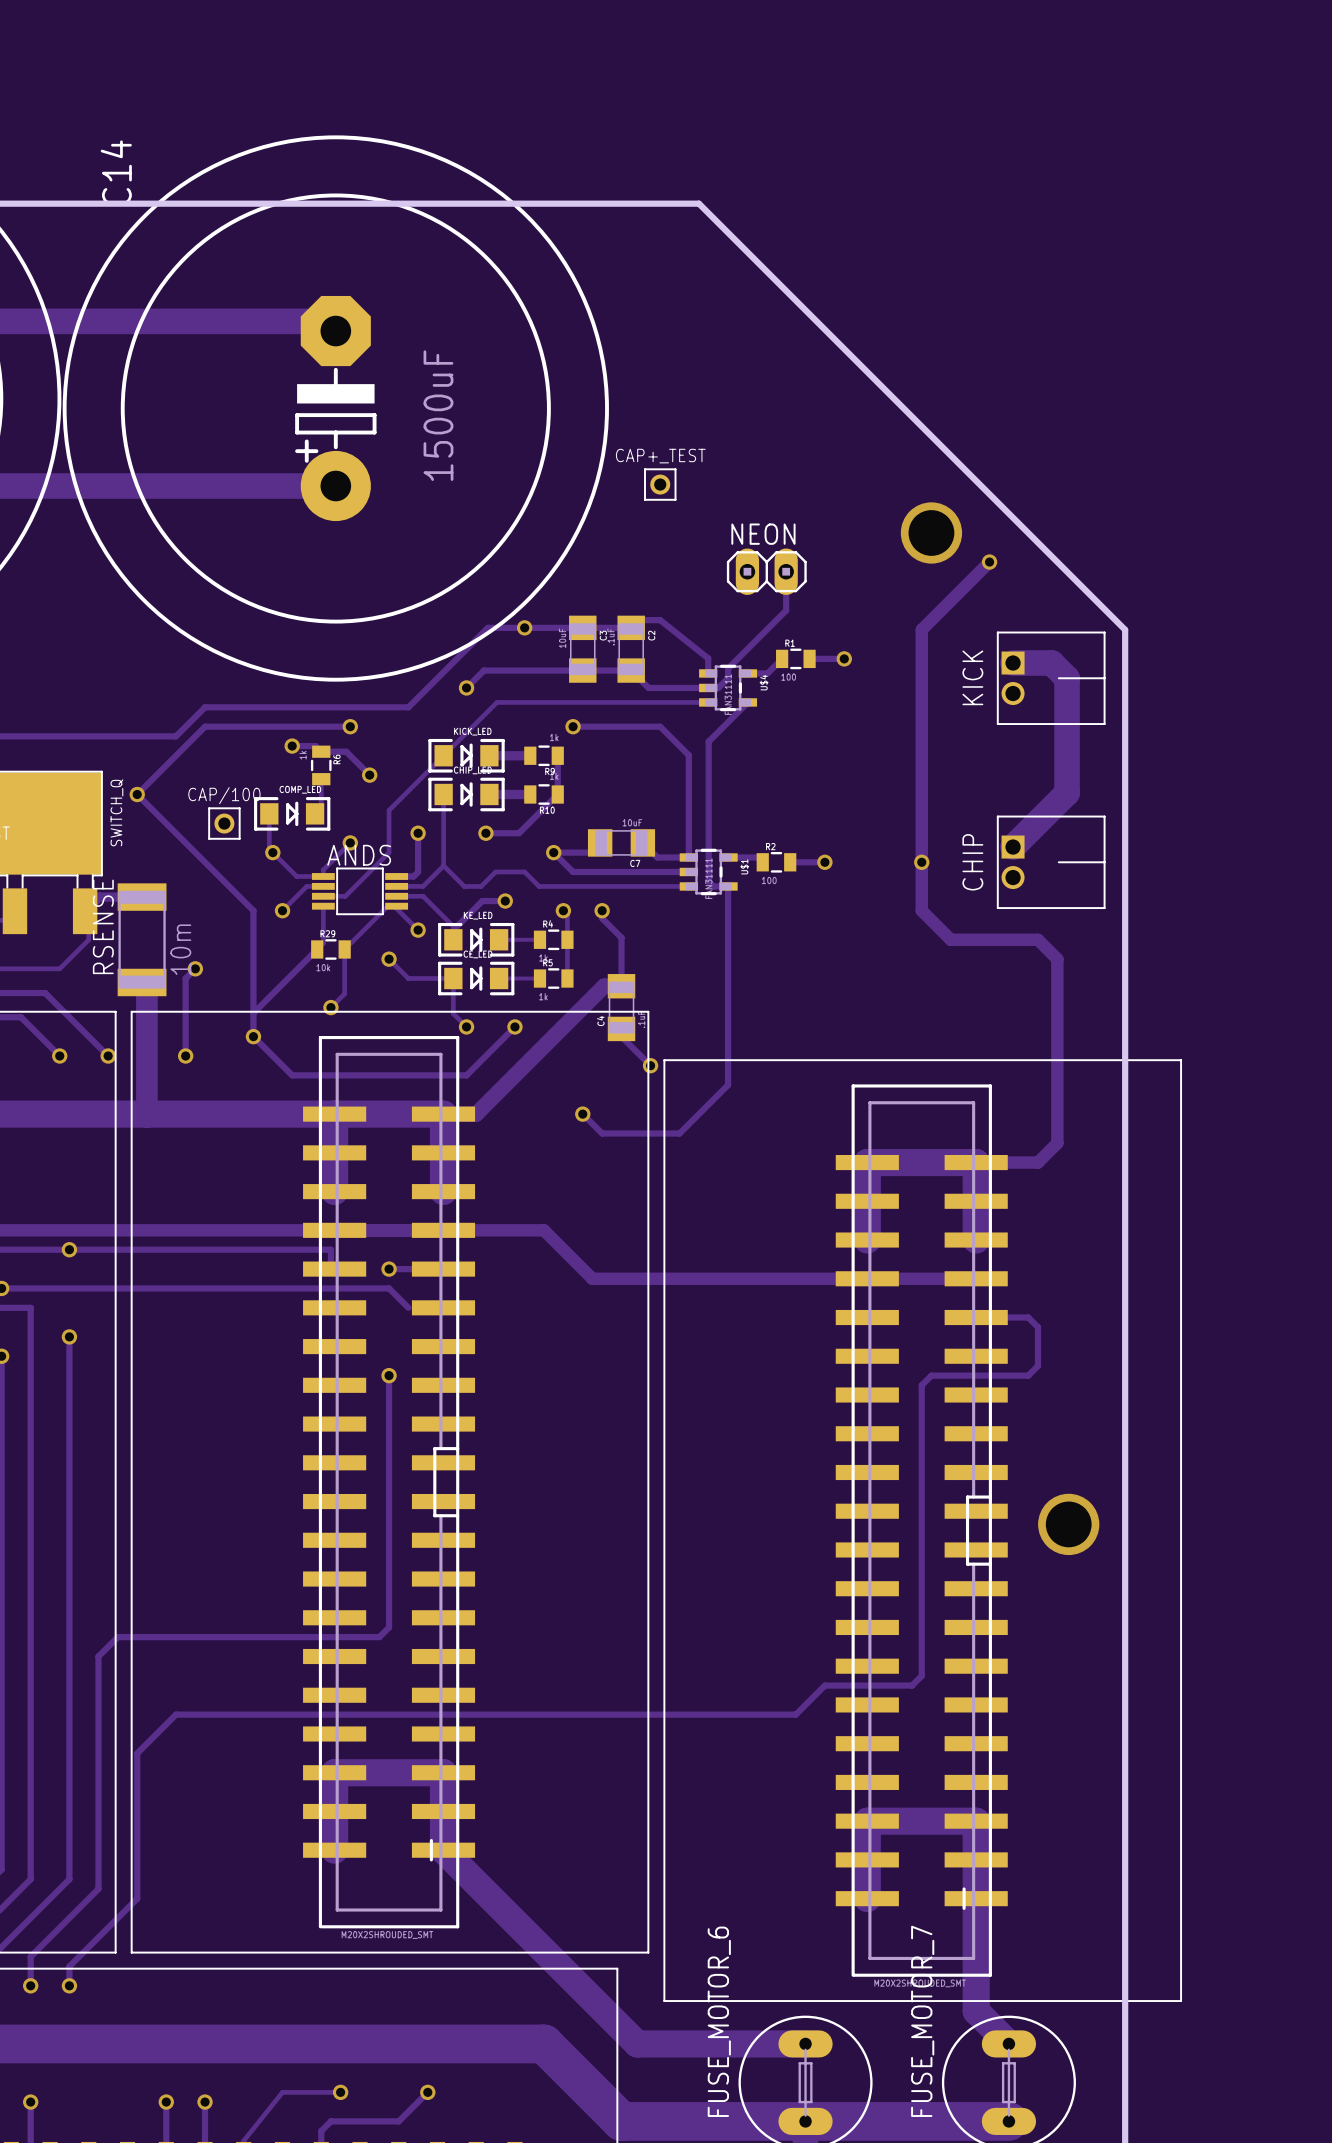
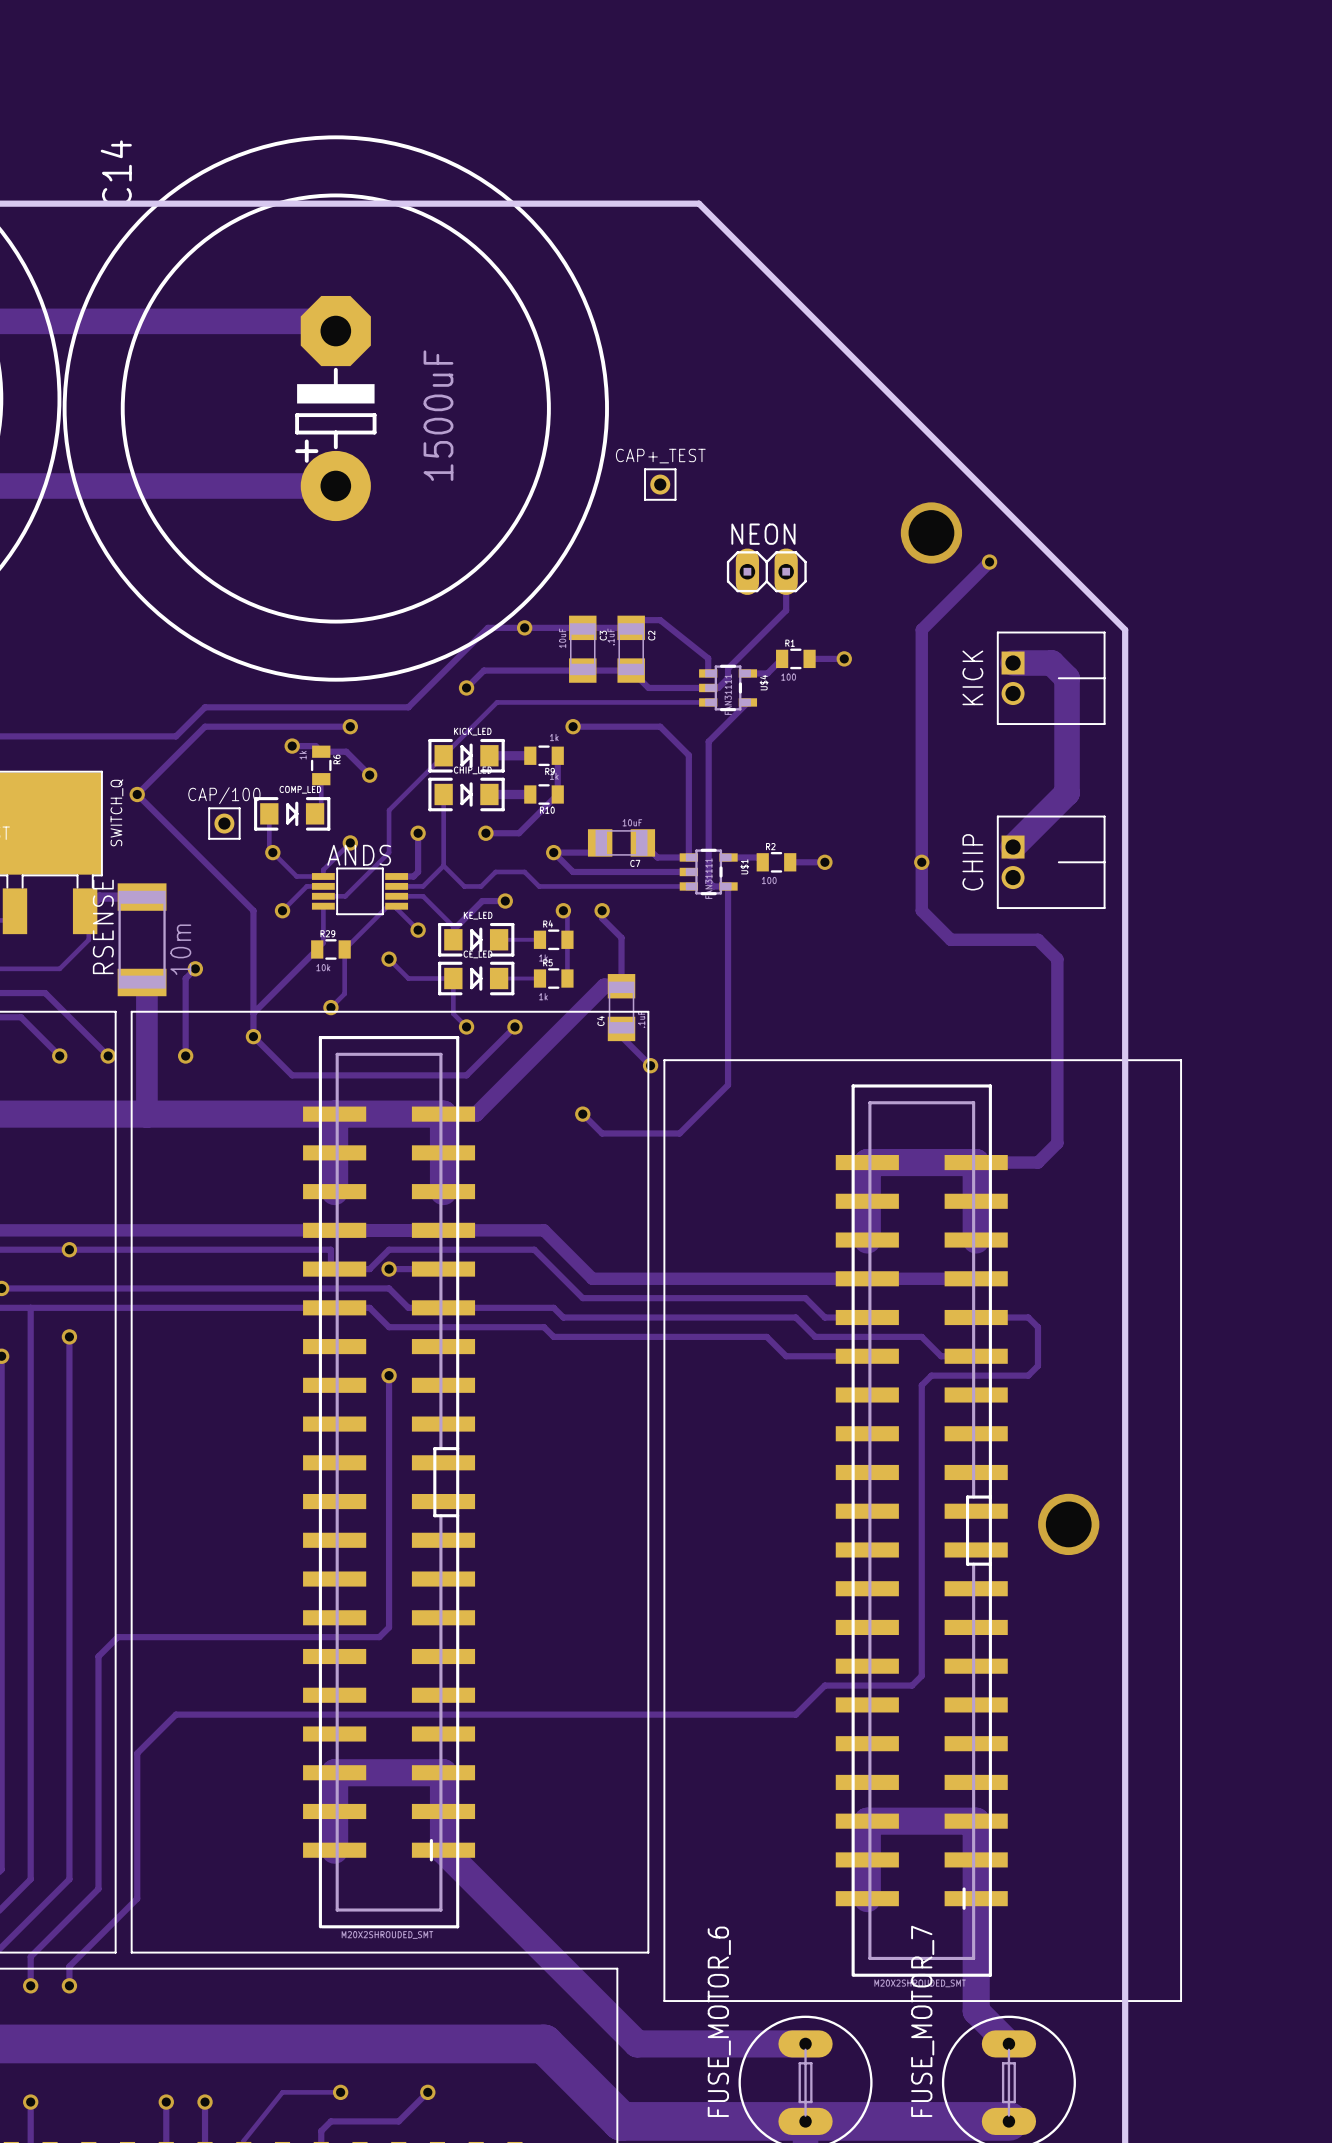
track: none -> (330, 1265) (334, 1269) (369, 1269) (389, 1249) (534, 1249) (582, 1298) (805, 1298) (824, 1317) (867, 1317)
track: none -> (30, 1307) (369, 1307) (389, 1327) (544, 1327) (553, 1336) (766, 1336) (786, 1356) (867, 1356)
track: none -> (408, 1307) (553, 1307) (563, 1317) (795, 1317) (815, 1336) (921, 1336) (941, 1356) (976, 1356)

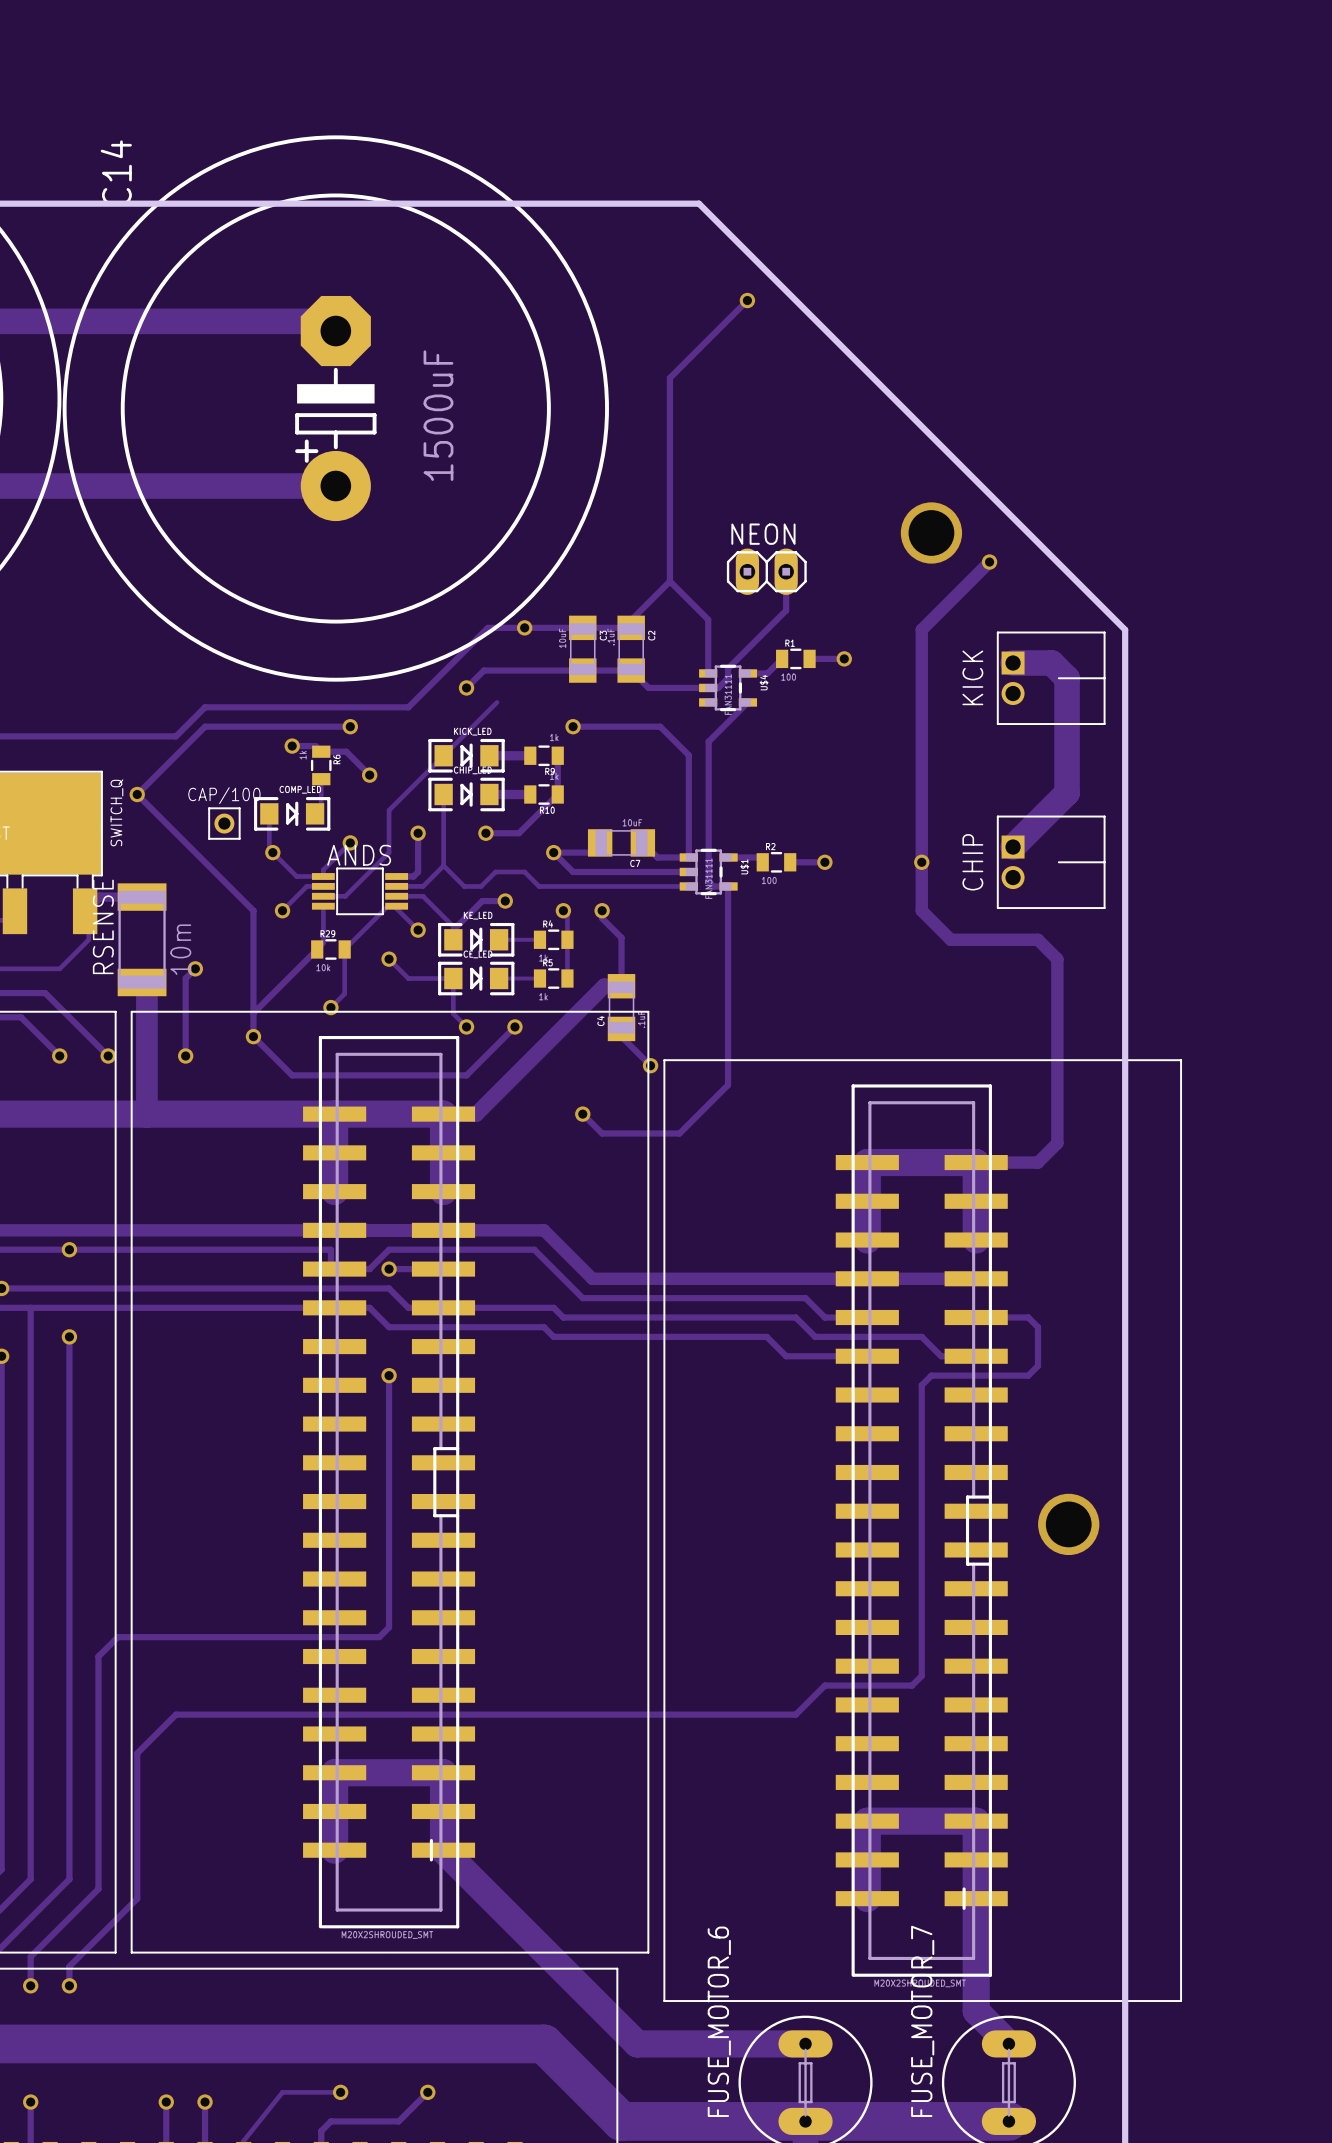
track: none -> (747, 300) (669, 378) (669, 581)
via: none -> (747, 300)
CAP+_TEST: (660, 484) -> none
track: none -> (669, 581) (631, 620)
track: (631, 620) (660, 620) (708, 658) -> (669, 581) (708, 619) (708, 658)
track: (496, 702) (708, 702) -> none

